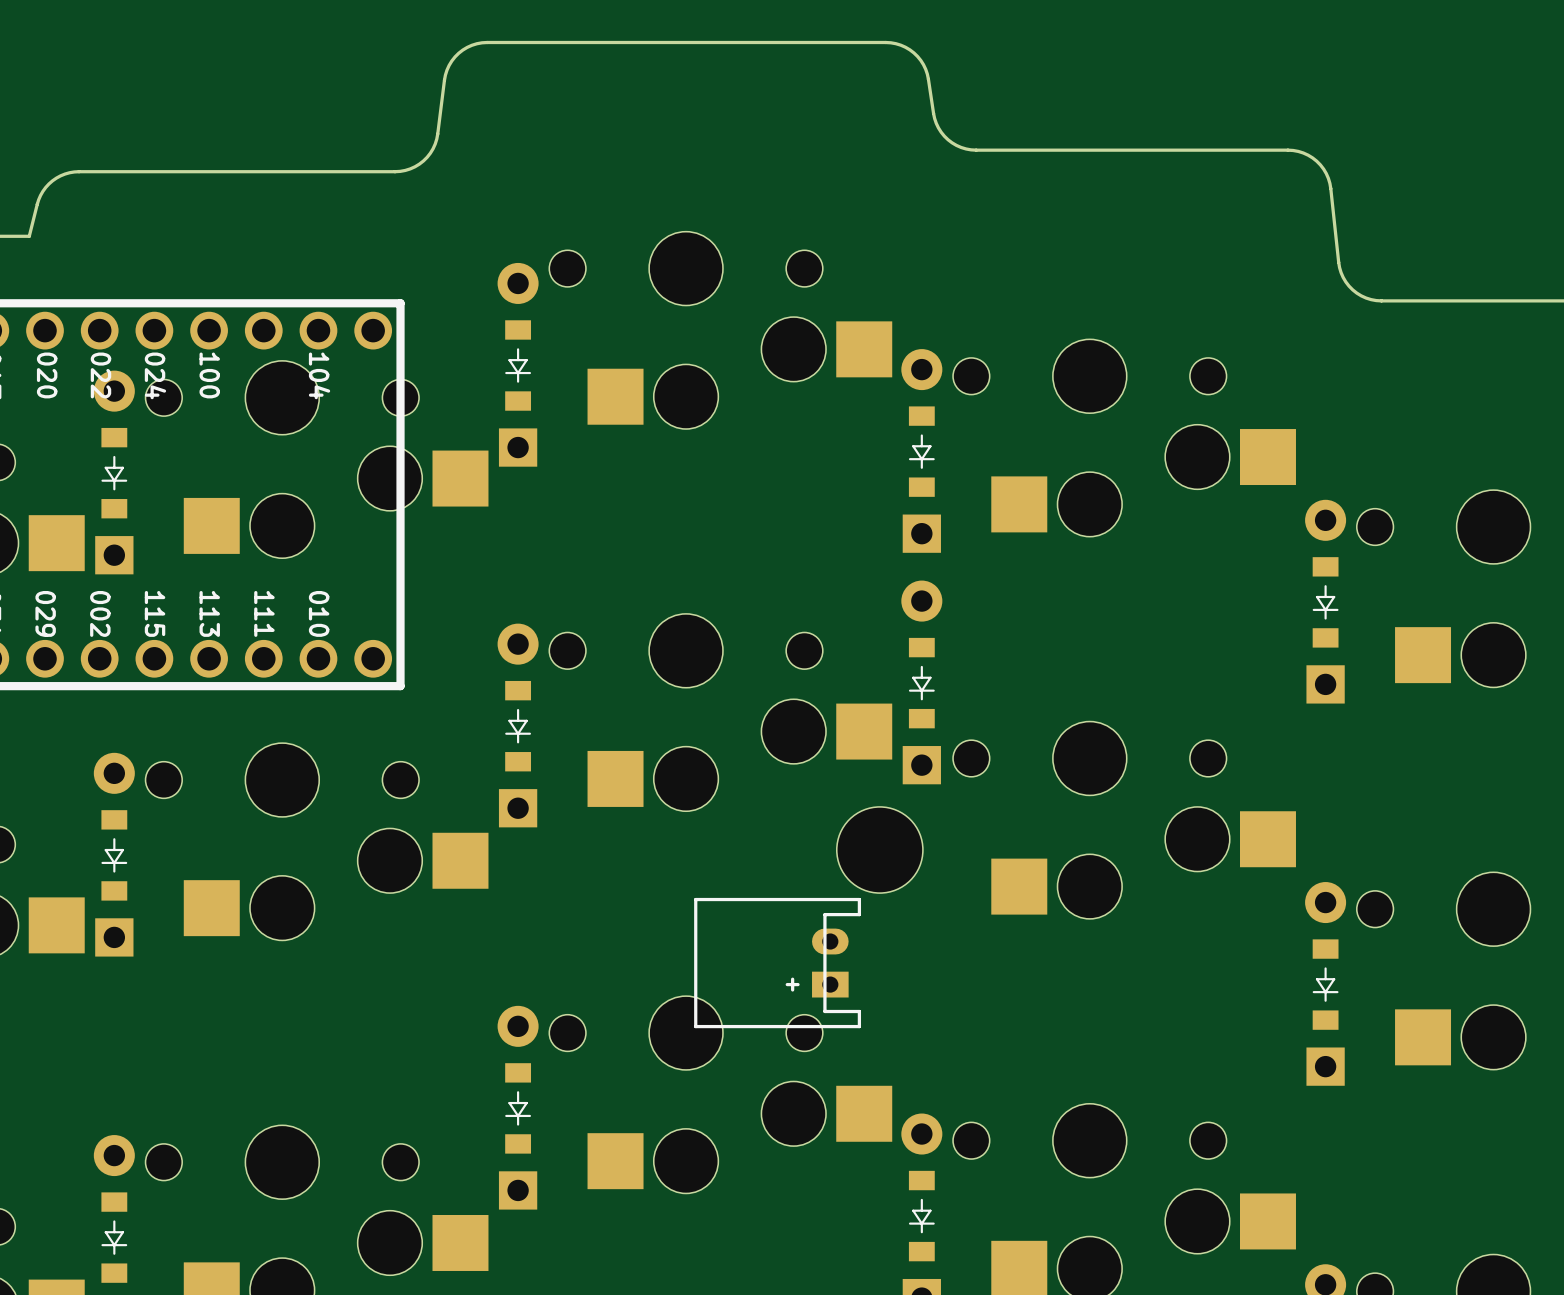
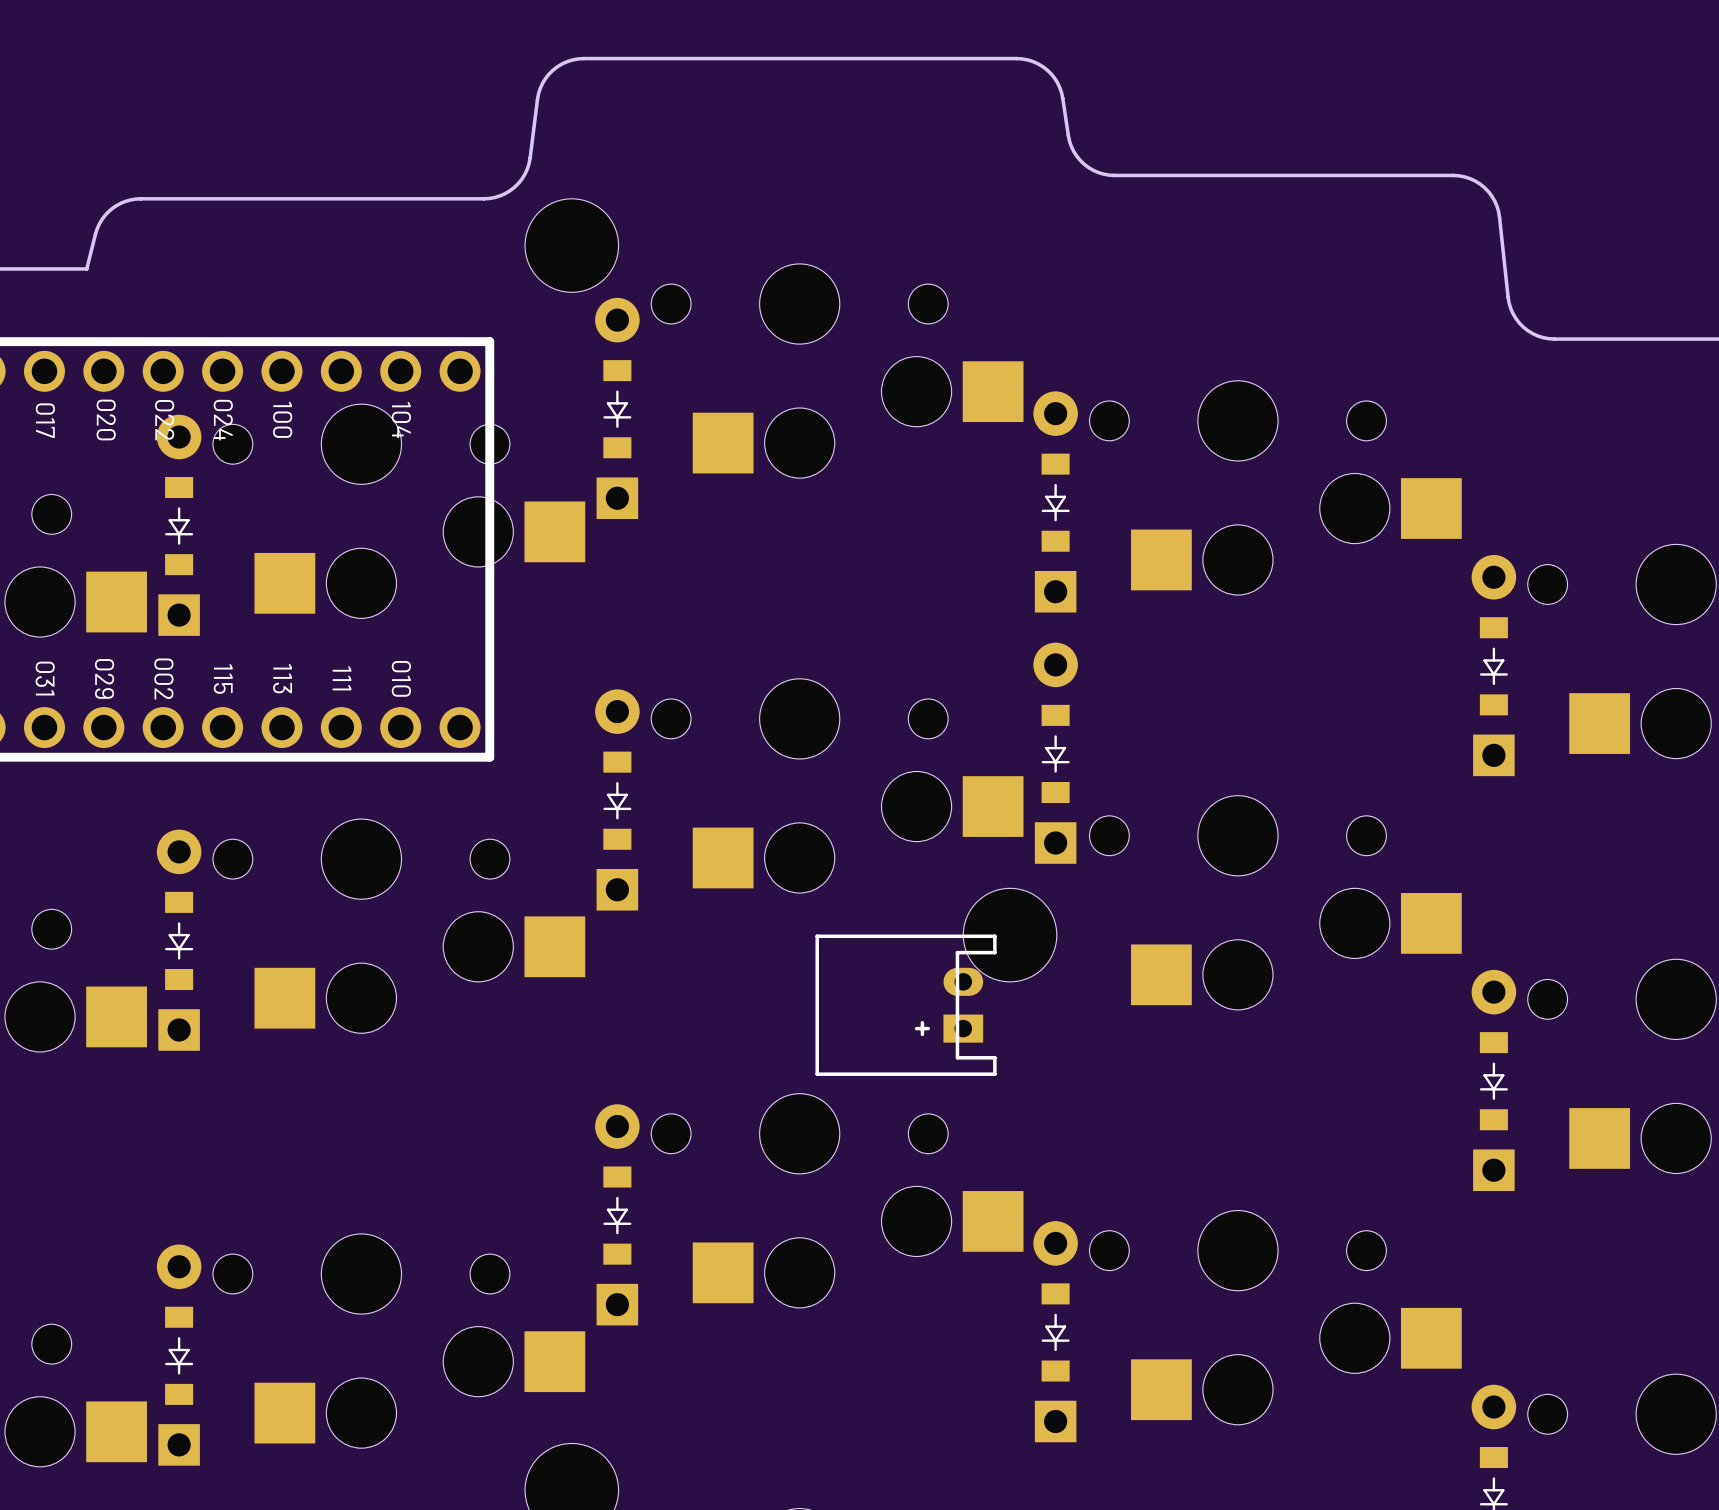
part: none -> (571, 245)
part position: (777, 963) -> (906, 1005)

